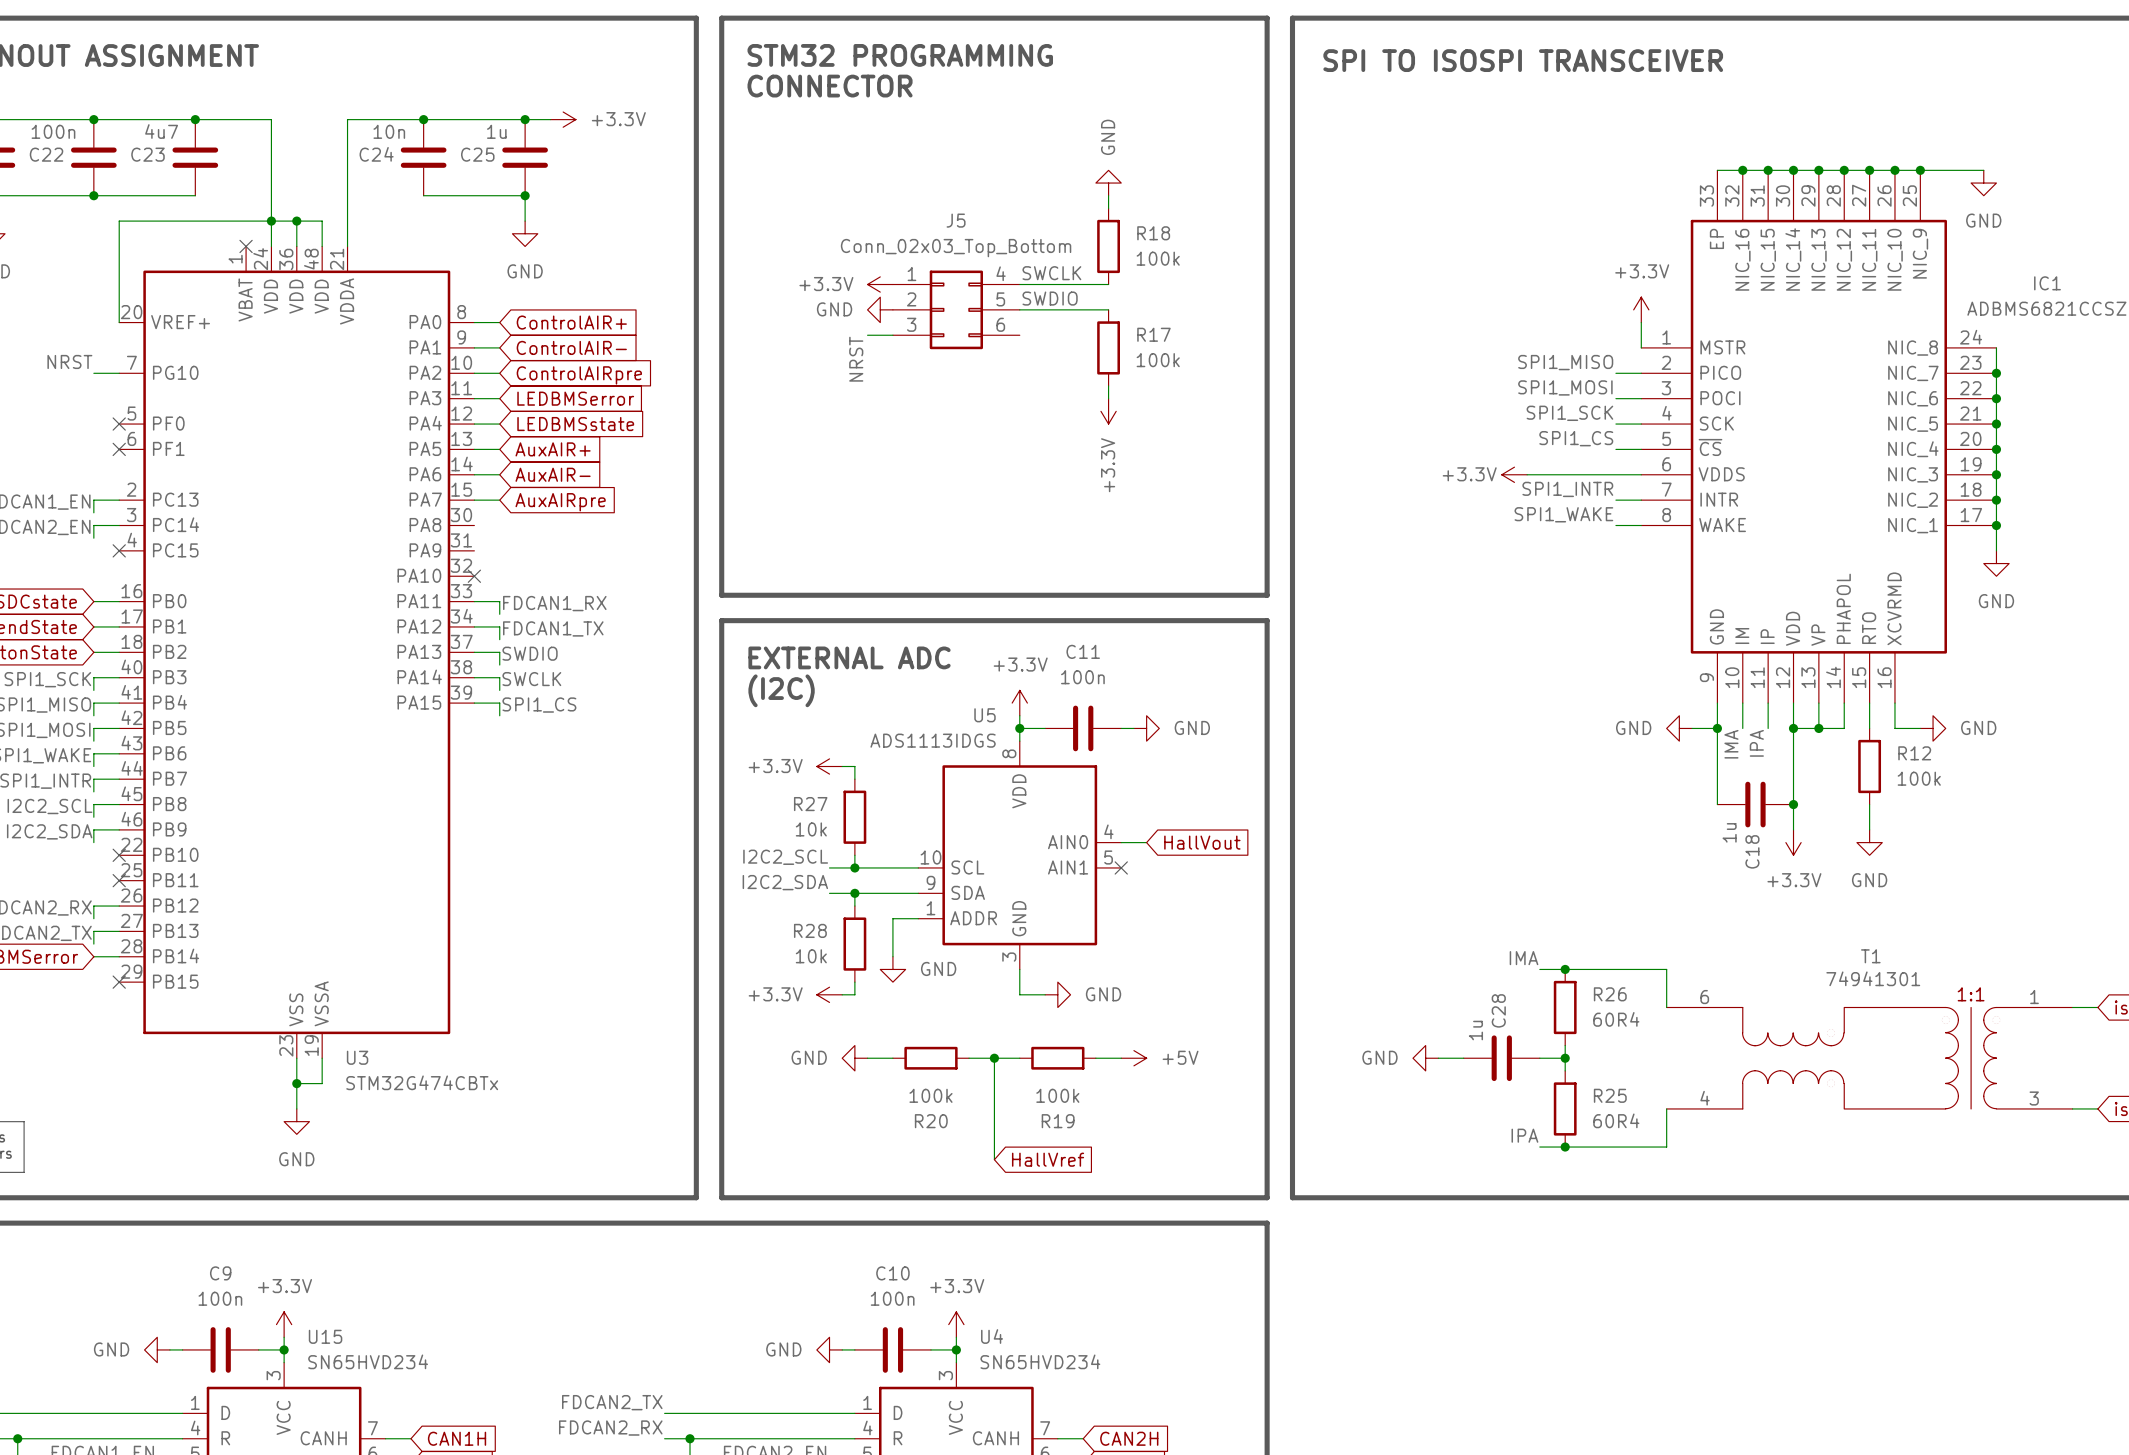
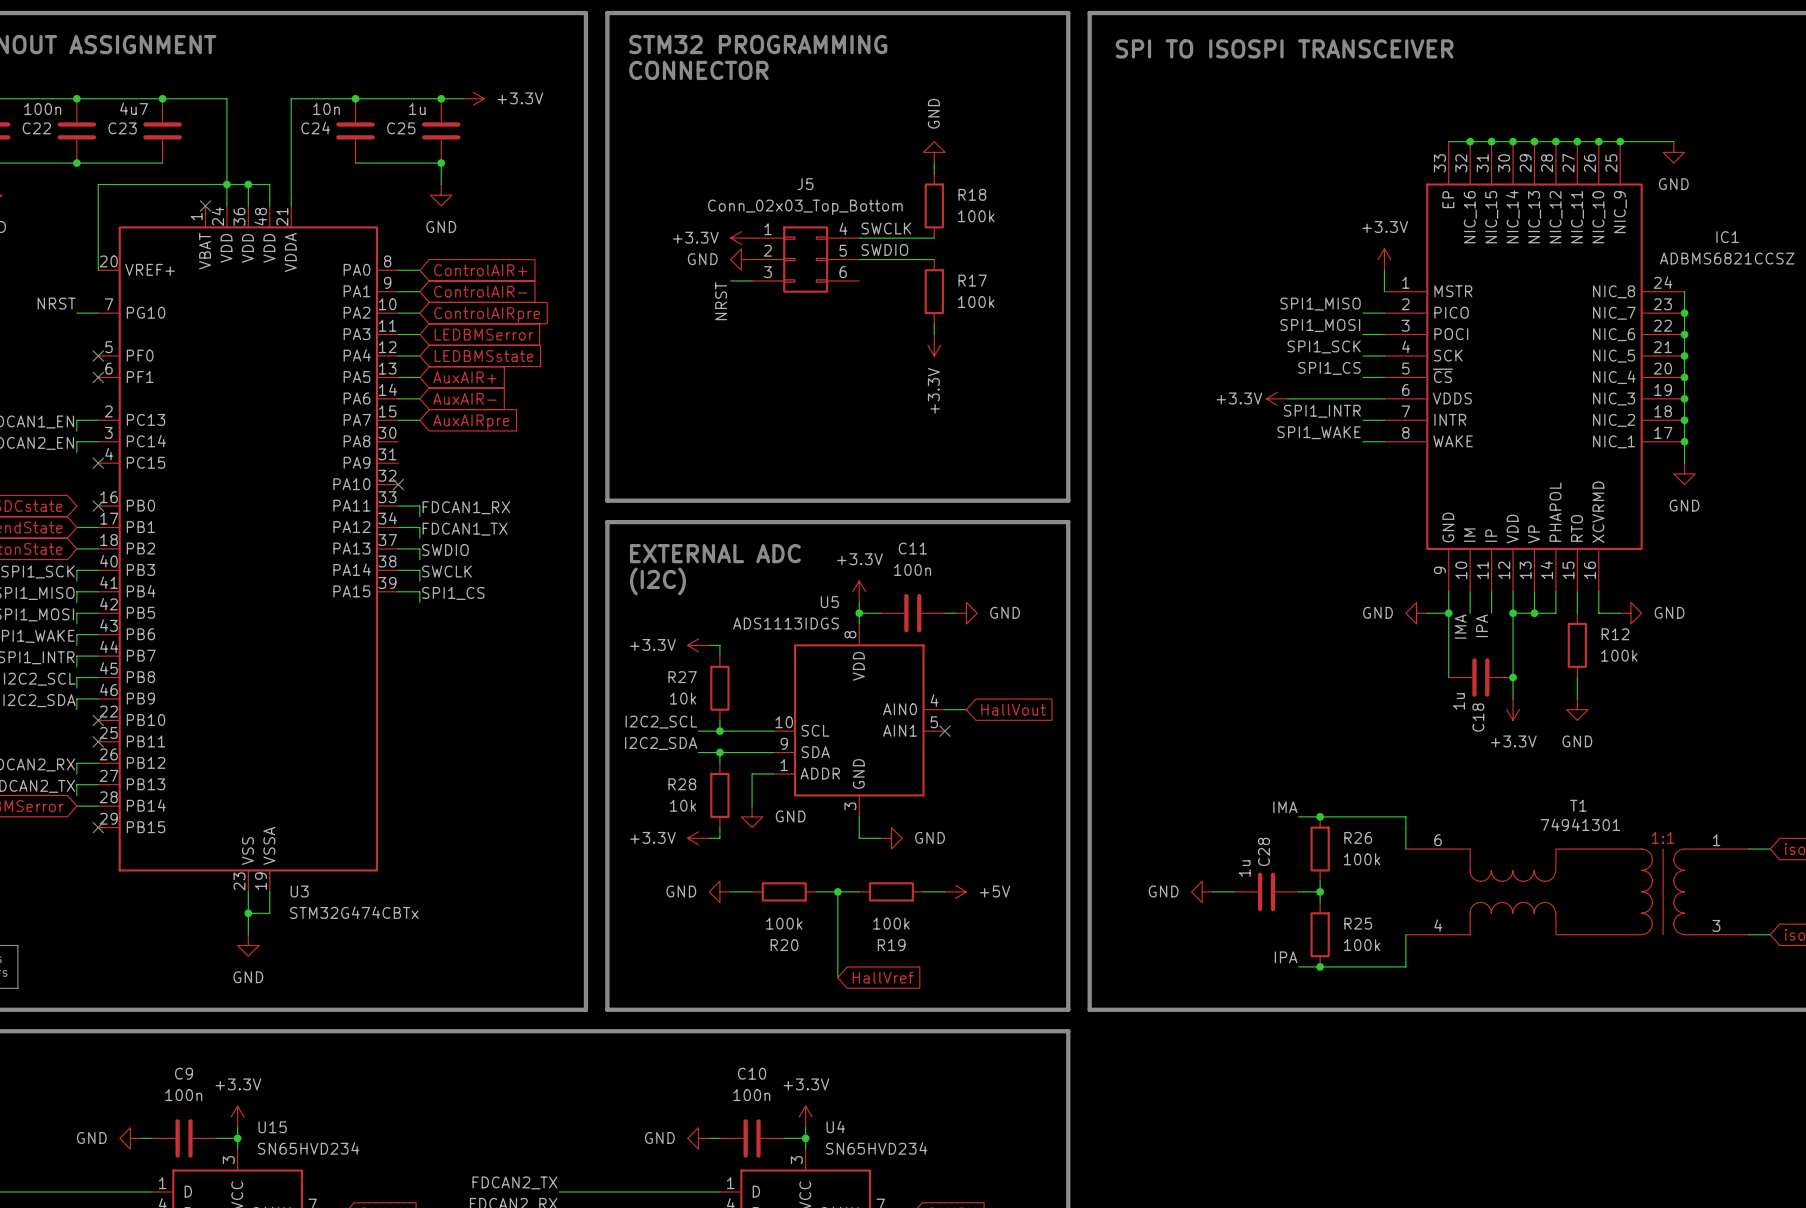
wire: (93, 601) (119, 601) -> none
no-connect mark: none -> (98, 506)
R26 value: 60R4 (1616, 1019) -> 100k (1362, 859)
R25 value: 60R4 (1616, 1120) -> 100k (1362, 945)

